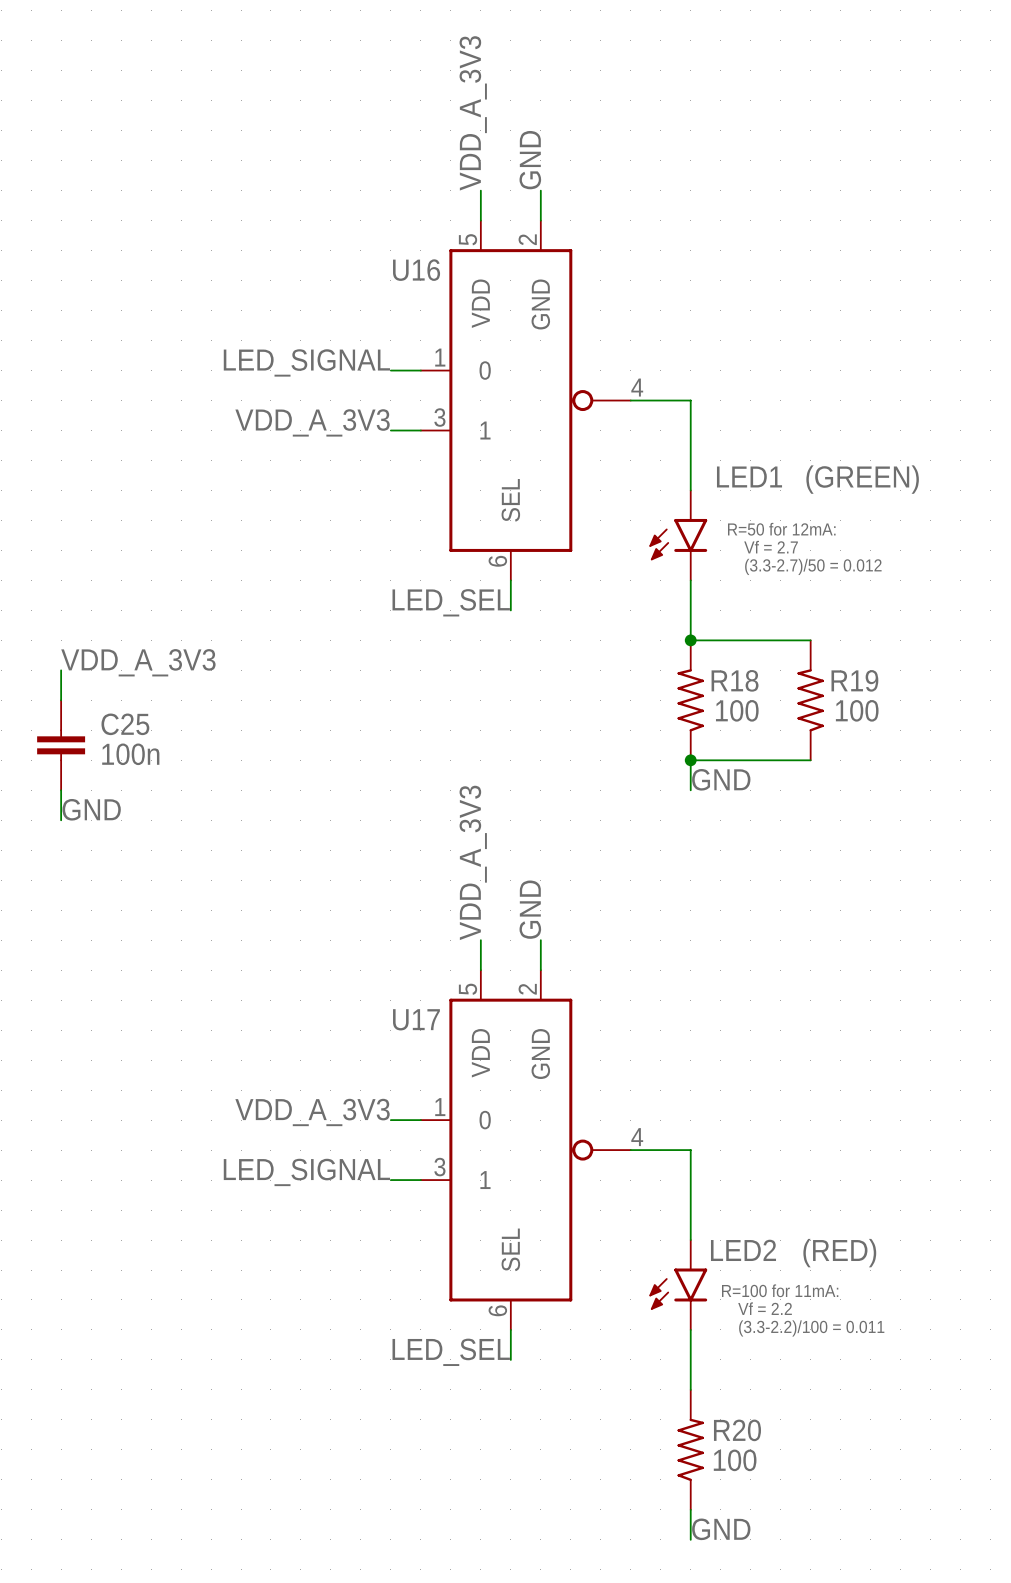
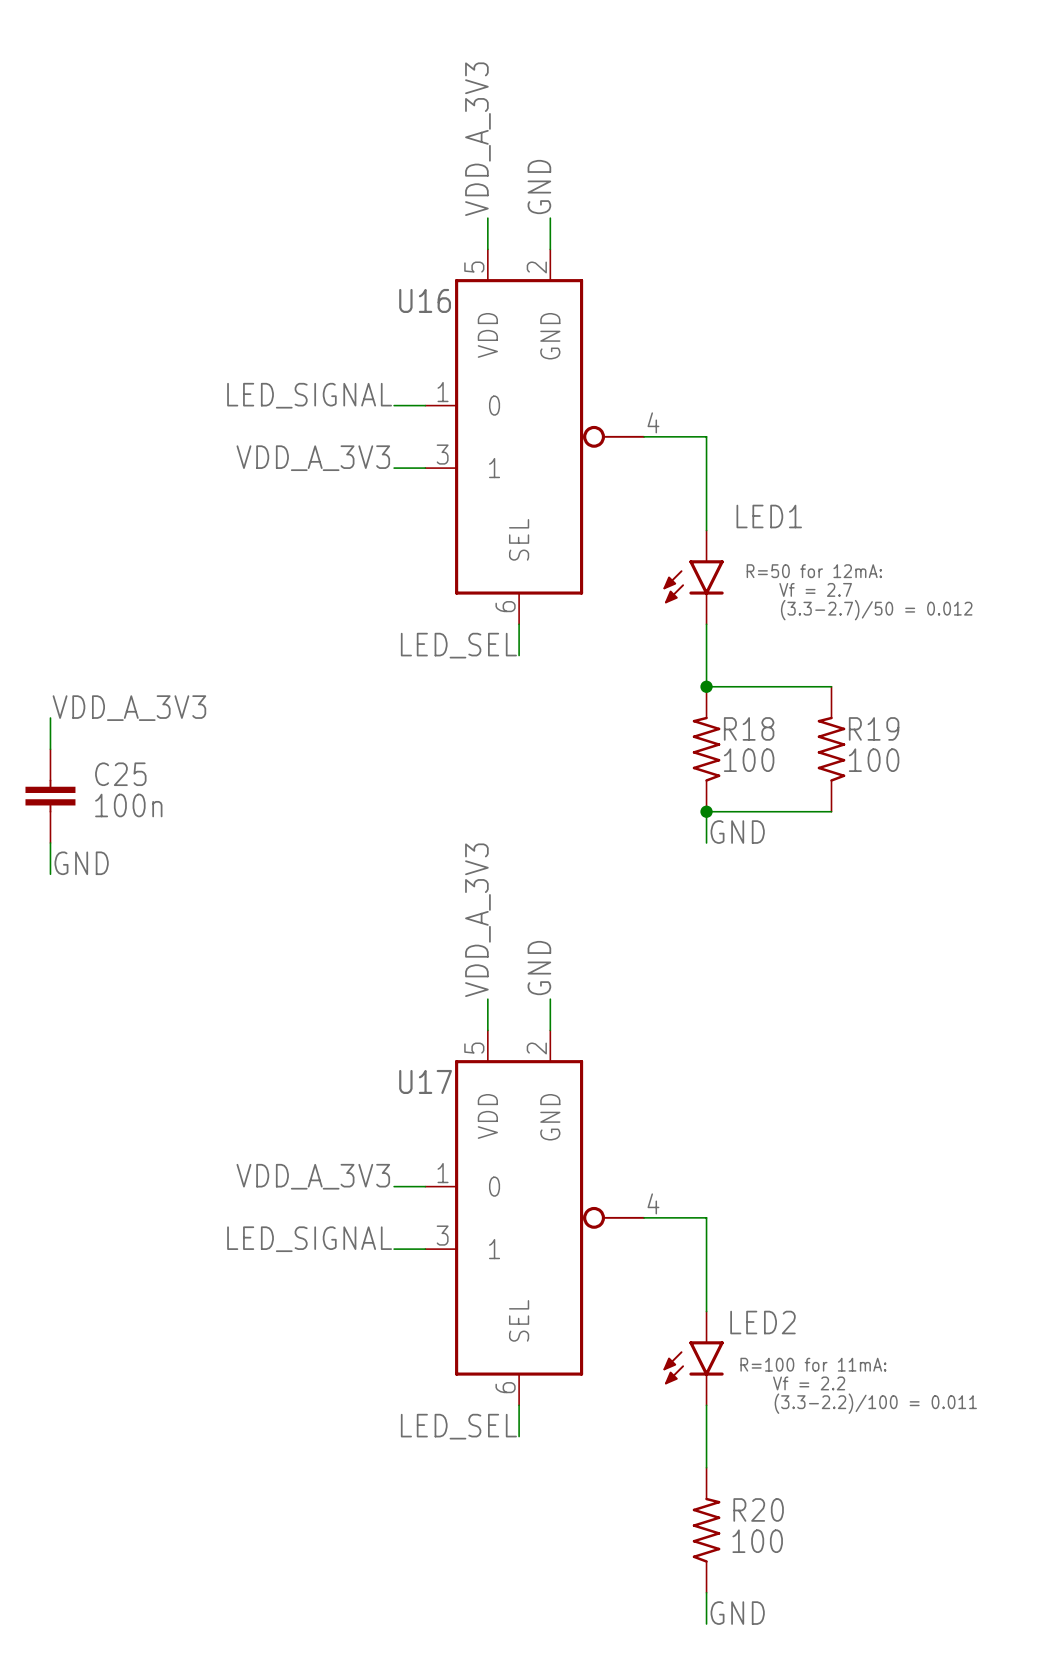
text: (GREEN) (862, 479) -> none
text: (RED) (839, 1253) -> none

